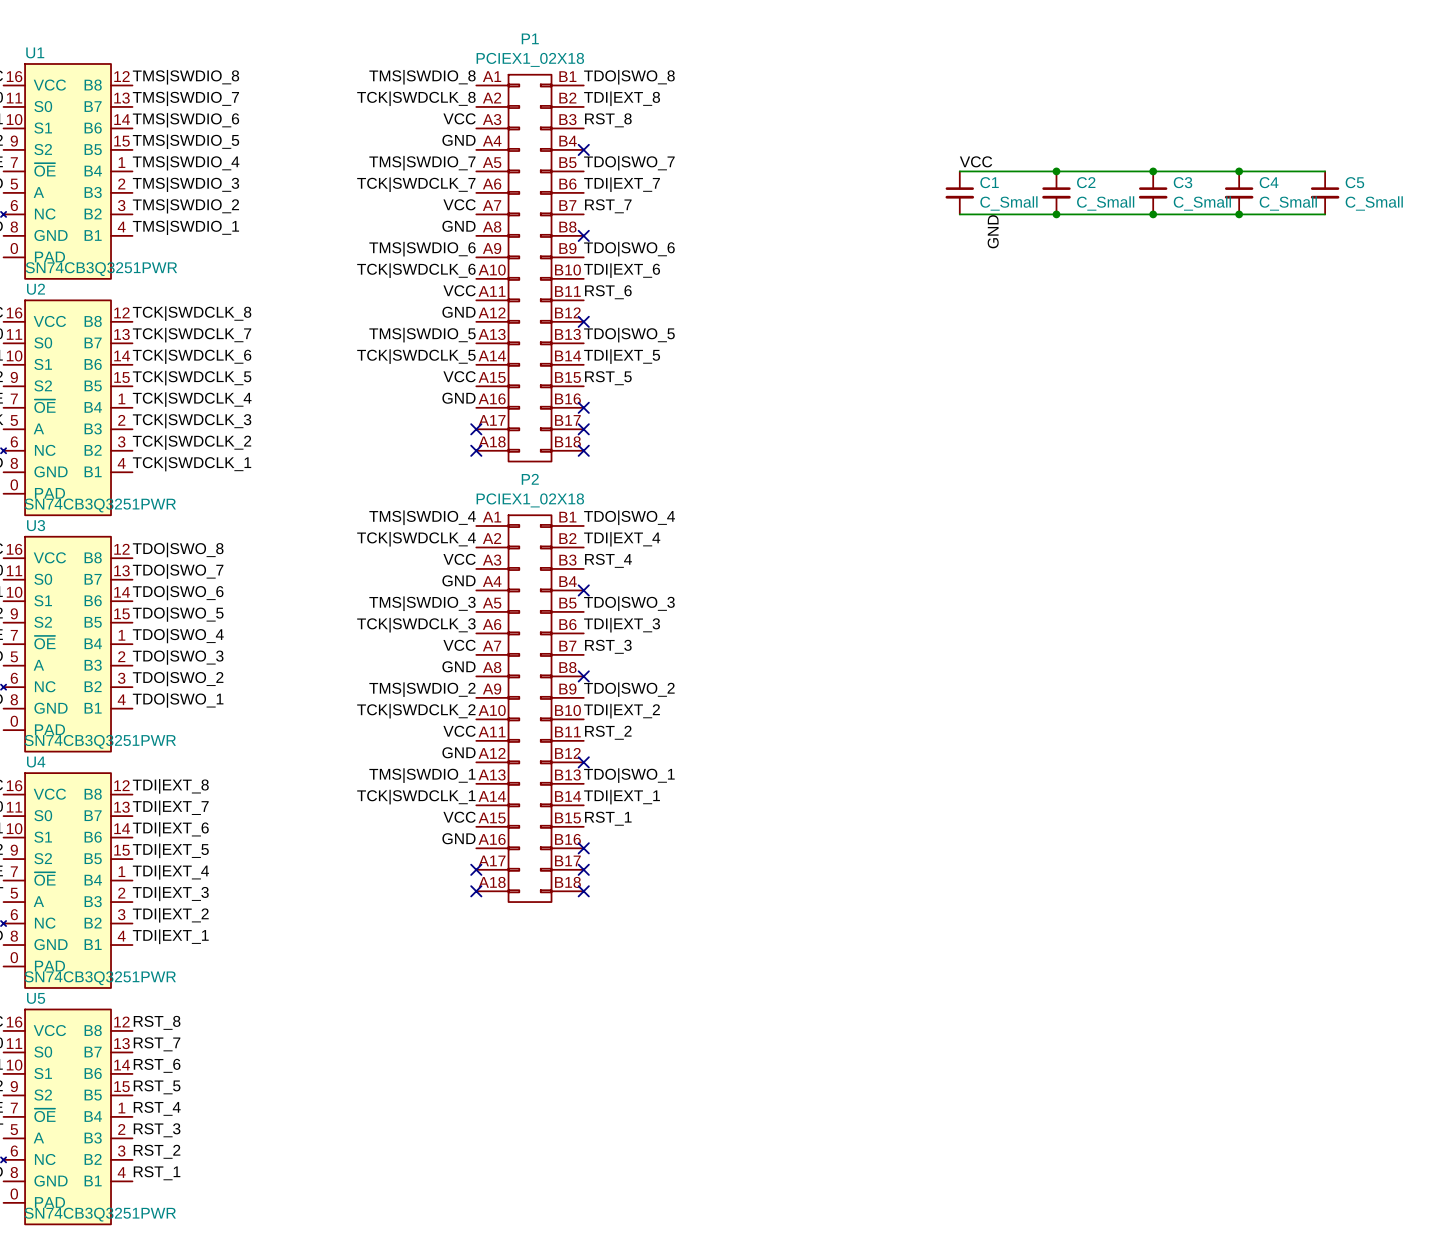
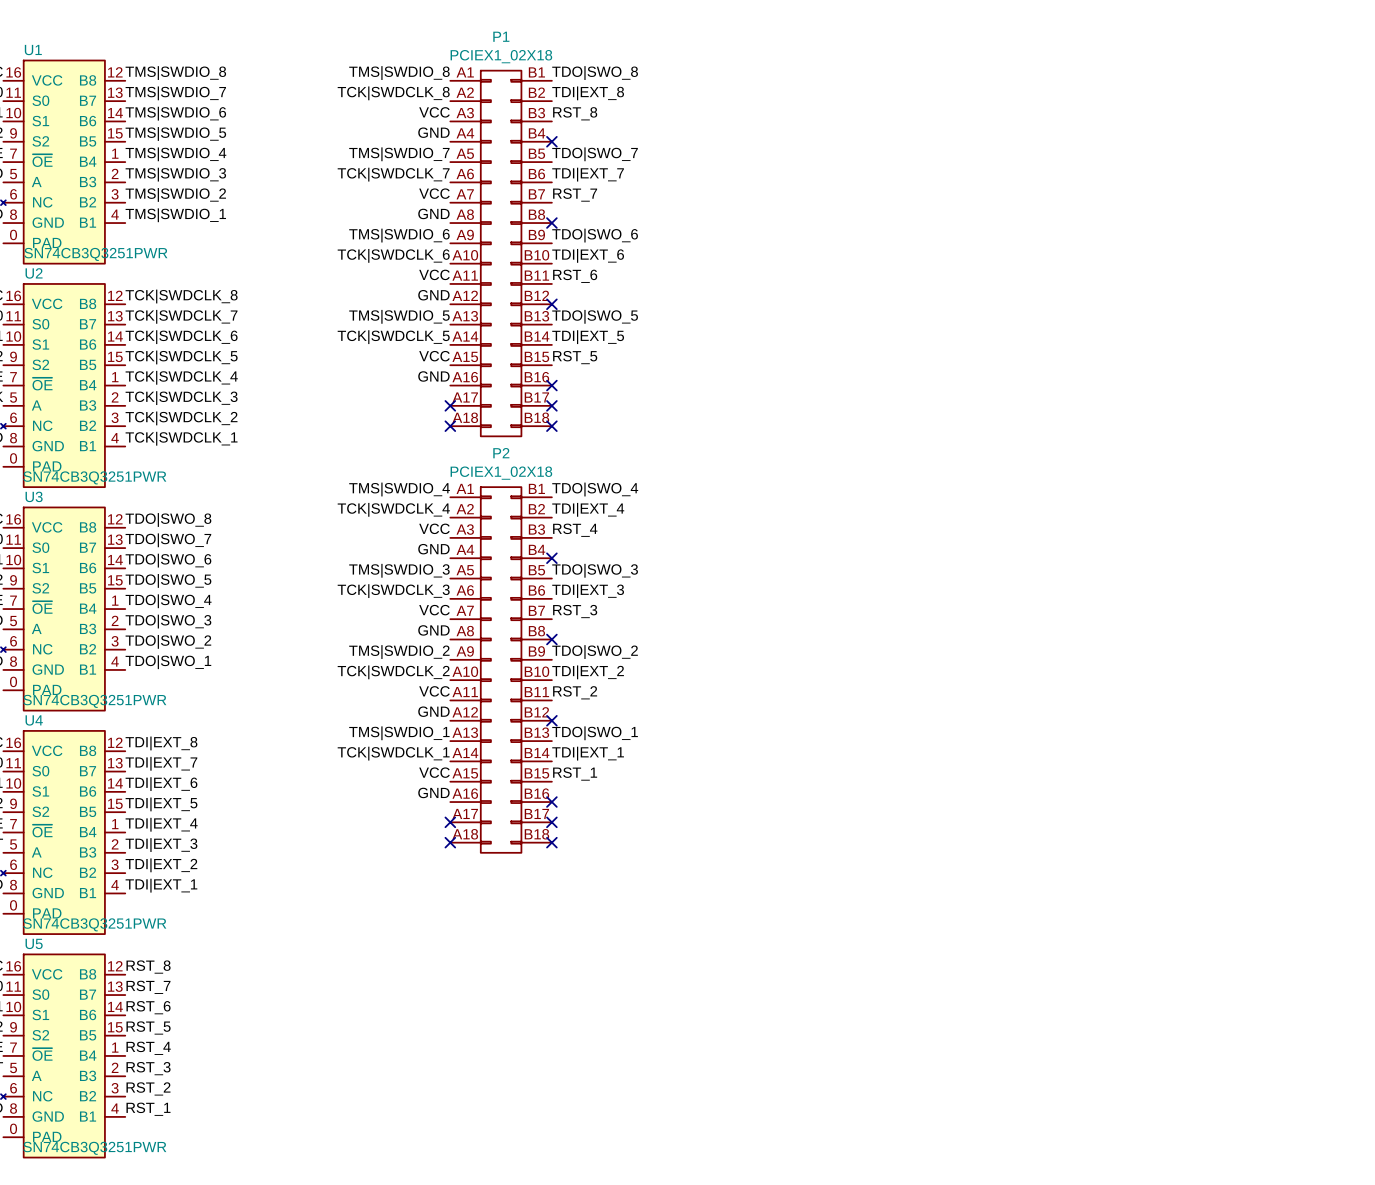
label: VCC (976, 161) -> none
wire: (959, 171) (1325, 171) -> none
junction: (1056, 171) -> none
junction: (1153, 171) -> none
junction: (1239, 171) -> none
C1: C_Small (959, 192) -> none
C2: C_Small (1056, 192) -> none
C3: C_Small (1153, 192) -> none
C4: C_Small (1239, 192) -> none
C5: C_Small (1325, 192) -> none
wire: (959, 214) (1325, 214) -> none
junction: (1056, 214) -> none
junction: (1153, 214) -> none
junction: (1239, 214) -> none
label: GND (993, 231) -> none

